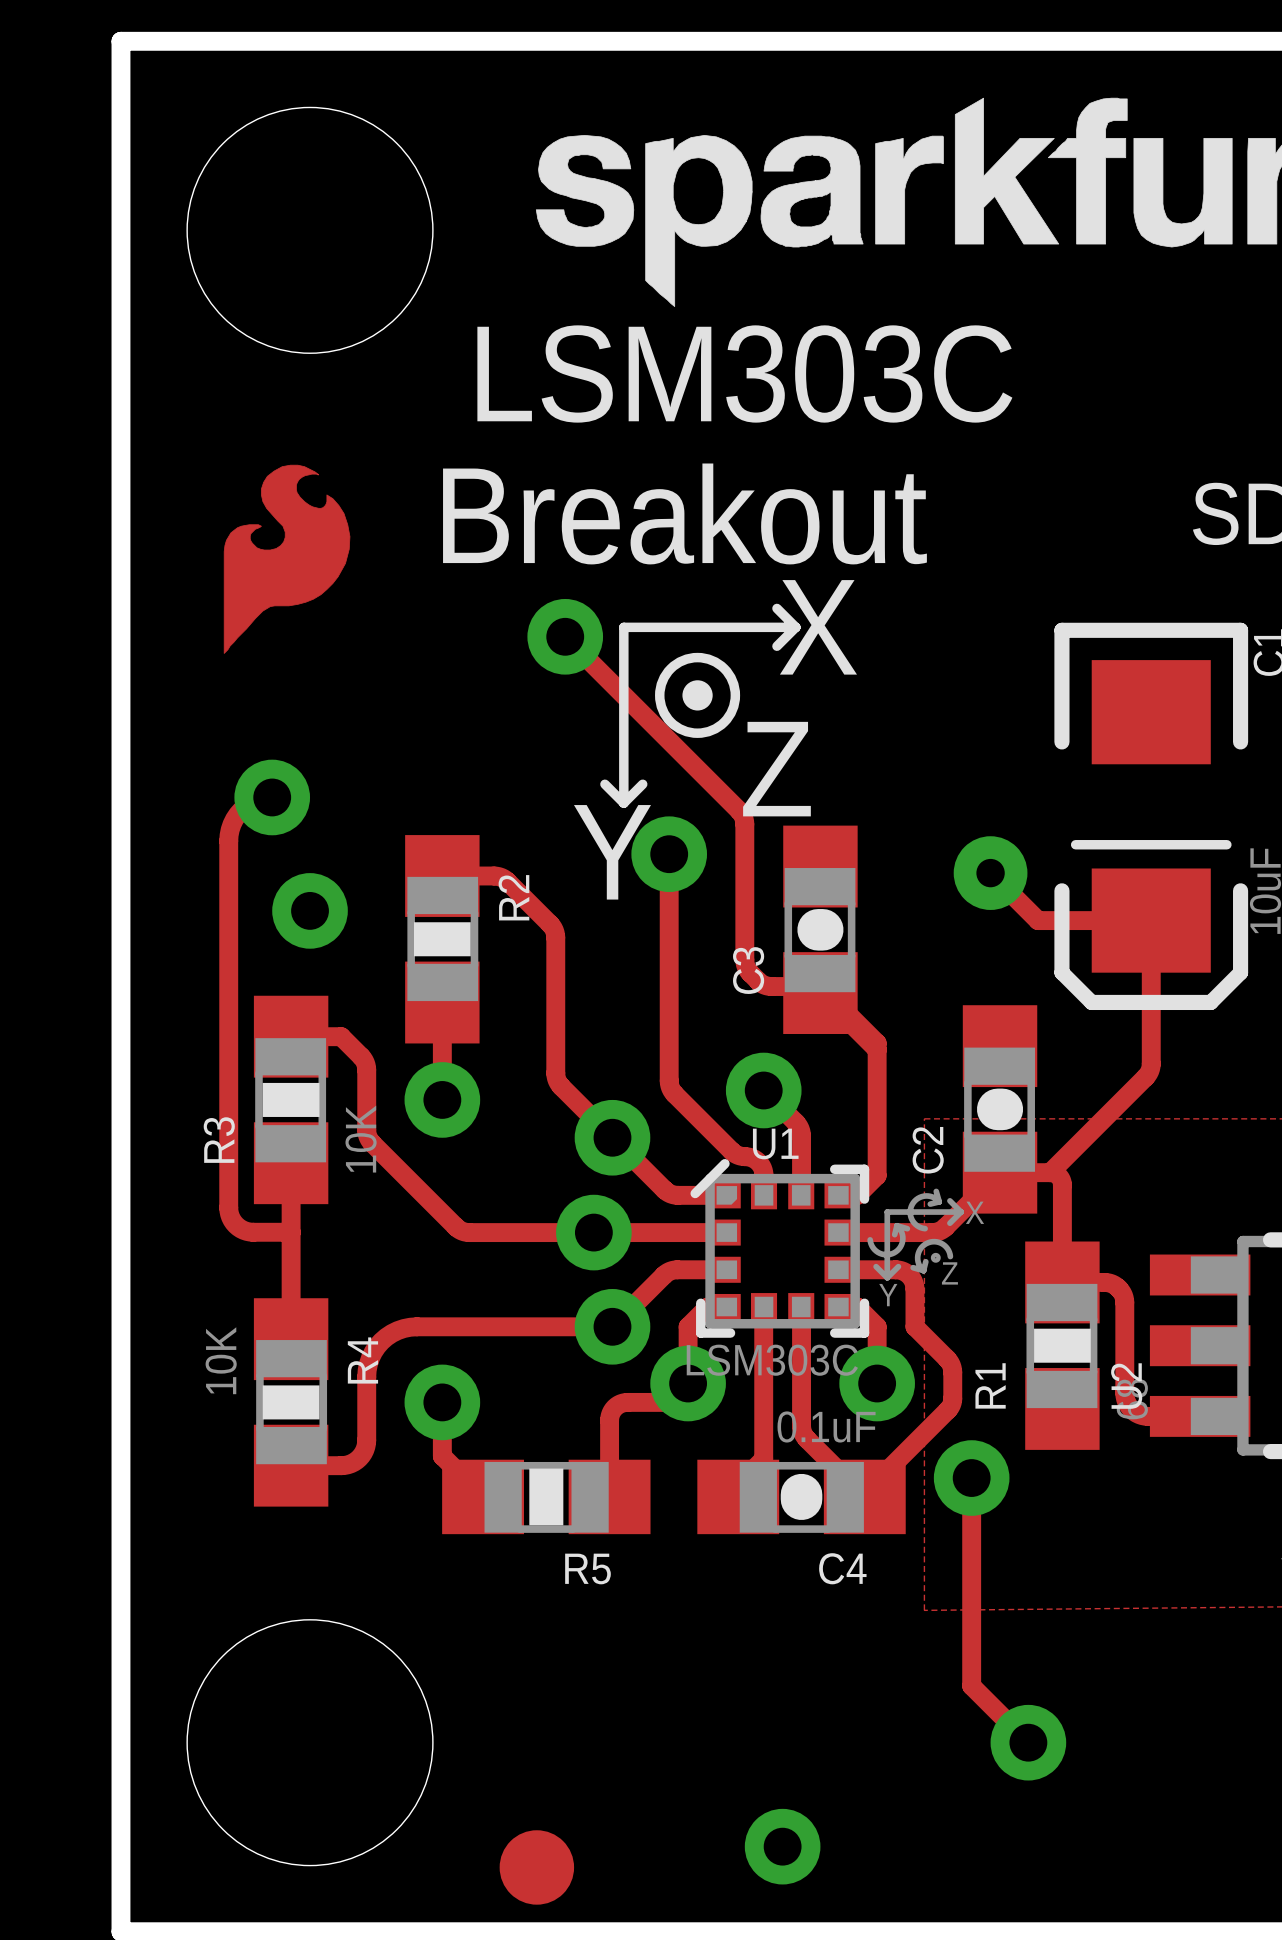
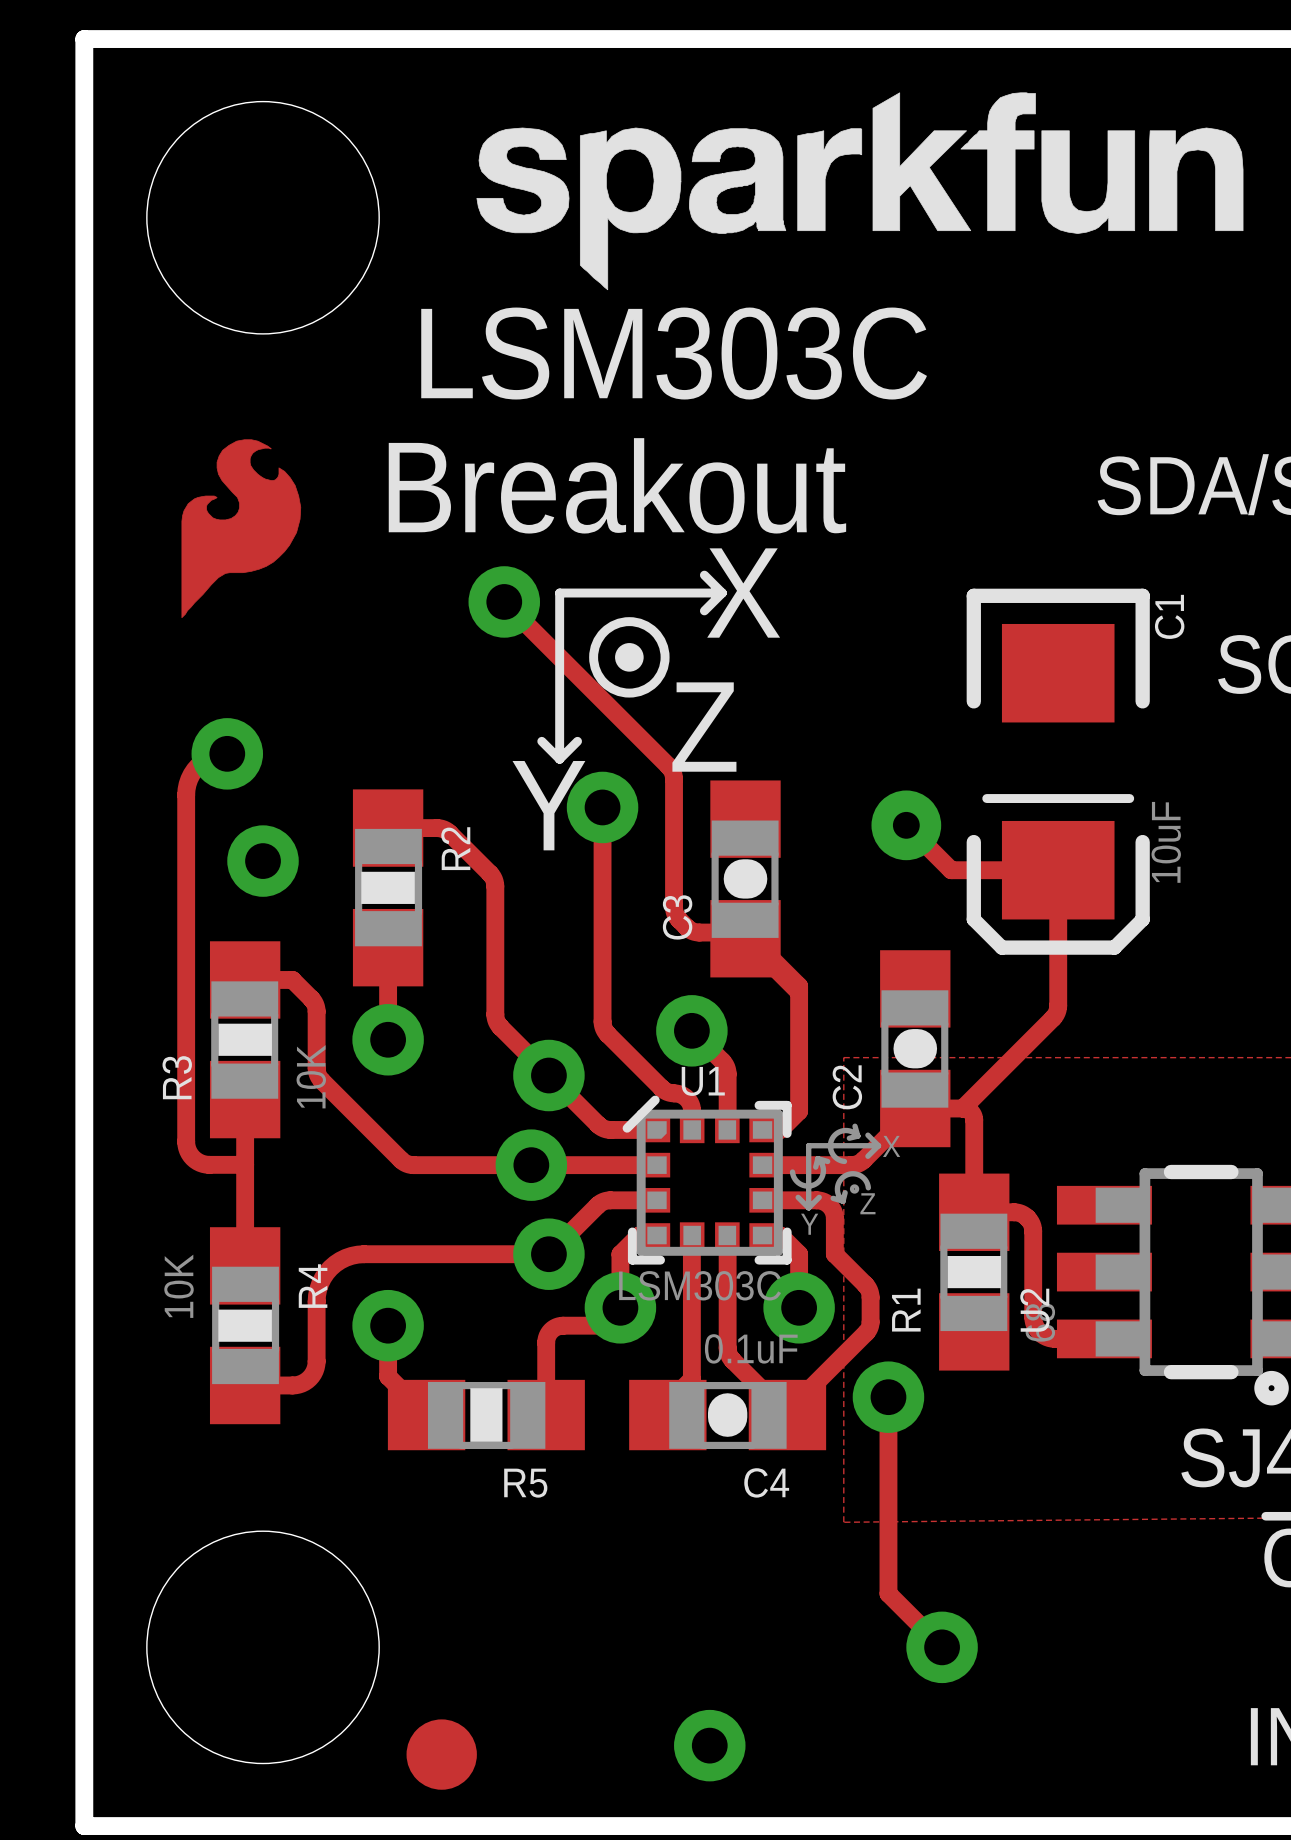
part position: (536, 1867) -> (441, 1754)

